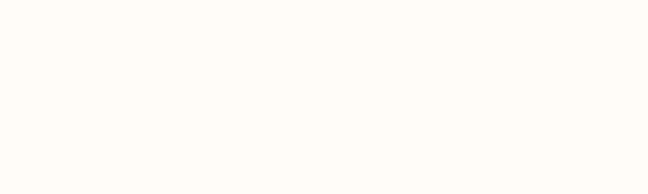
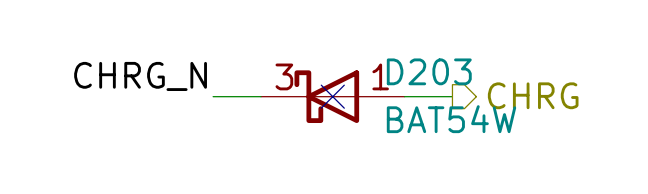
label: none -> CHRG_N (140, 76)
hierarchical label: none -> CHRG (533, 95)
wire: none -> (213, 96) (260, 96)
no-connect mark: none -> (332, 96)
D203: none -> BAT54W (332, 96)
wire: none -> (404, 96) (452, 96)

